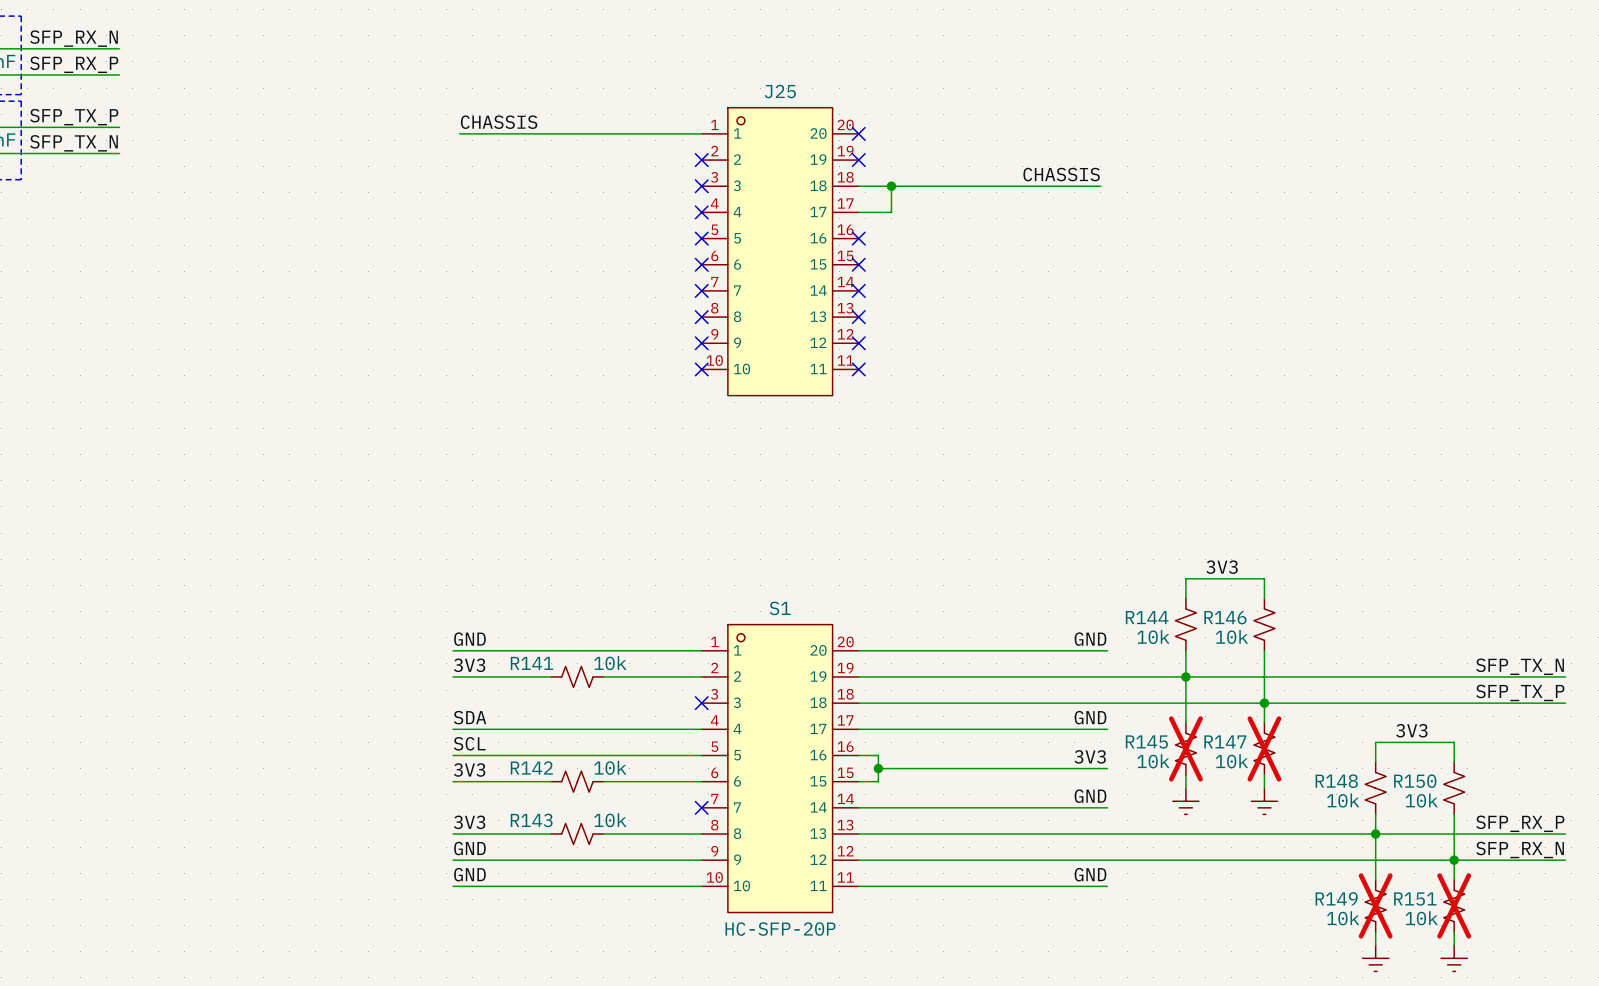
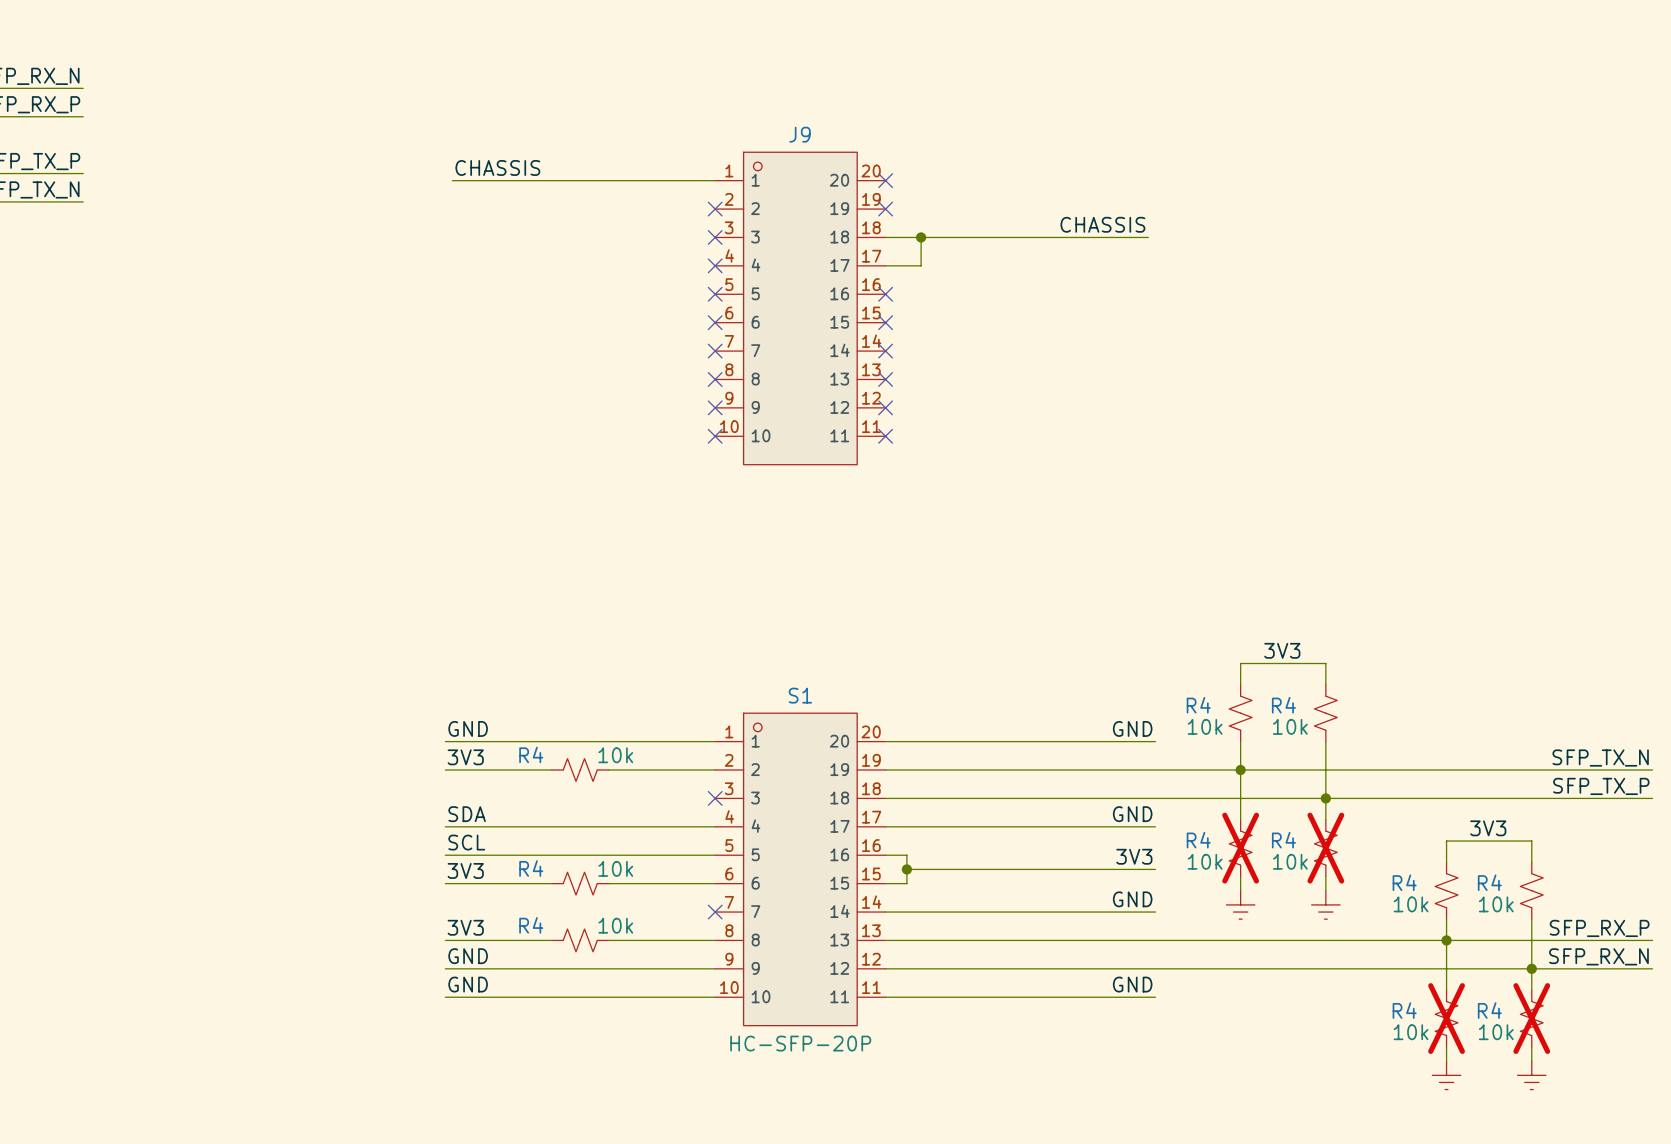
J25 name: J25 (780, 91) -> J9 (800, 134)
R144 name: R144 (1147, 617) -> R4 (1198, 705)
R146 name: R146 (1225, 617) -> R4 (1283, 705)
R141 name: R141 (531, 663) -> R4 (531, 754)
R147 name: R147 (1225, 741) -> R4 (1283, 840)
R145 name: R145 (1146, 742) -> R4 (1198, 840)
R142 name: R142 (531, 767) -> R4 (531, 868)
R148 name: R148 (1336, 781) -> R4 (1404, 882)
R150 name: R150 (1415, 781) -> R4 (1489, 882)
R143 name: R143 (531, 820) -> R4 (531, 925)
R149 name: R149 (1336, 898) -> R4 (1404, 1010)
R151 name: R151 (1415, 899) -> R4 (1489, 1010)

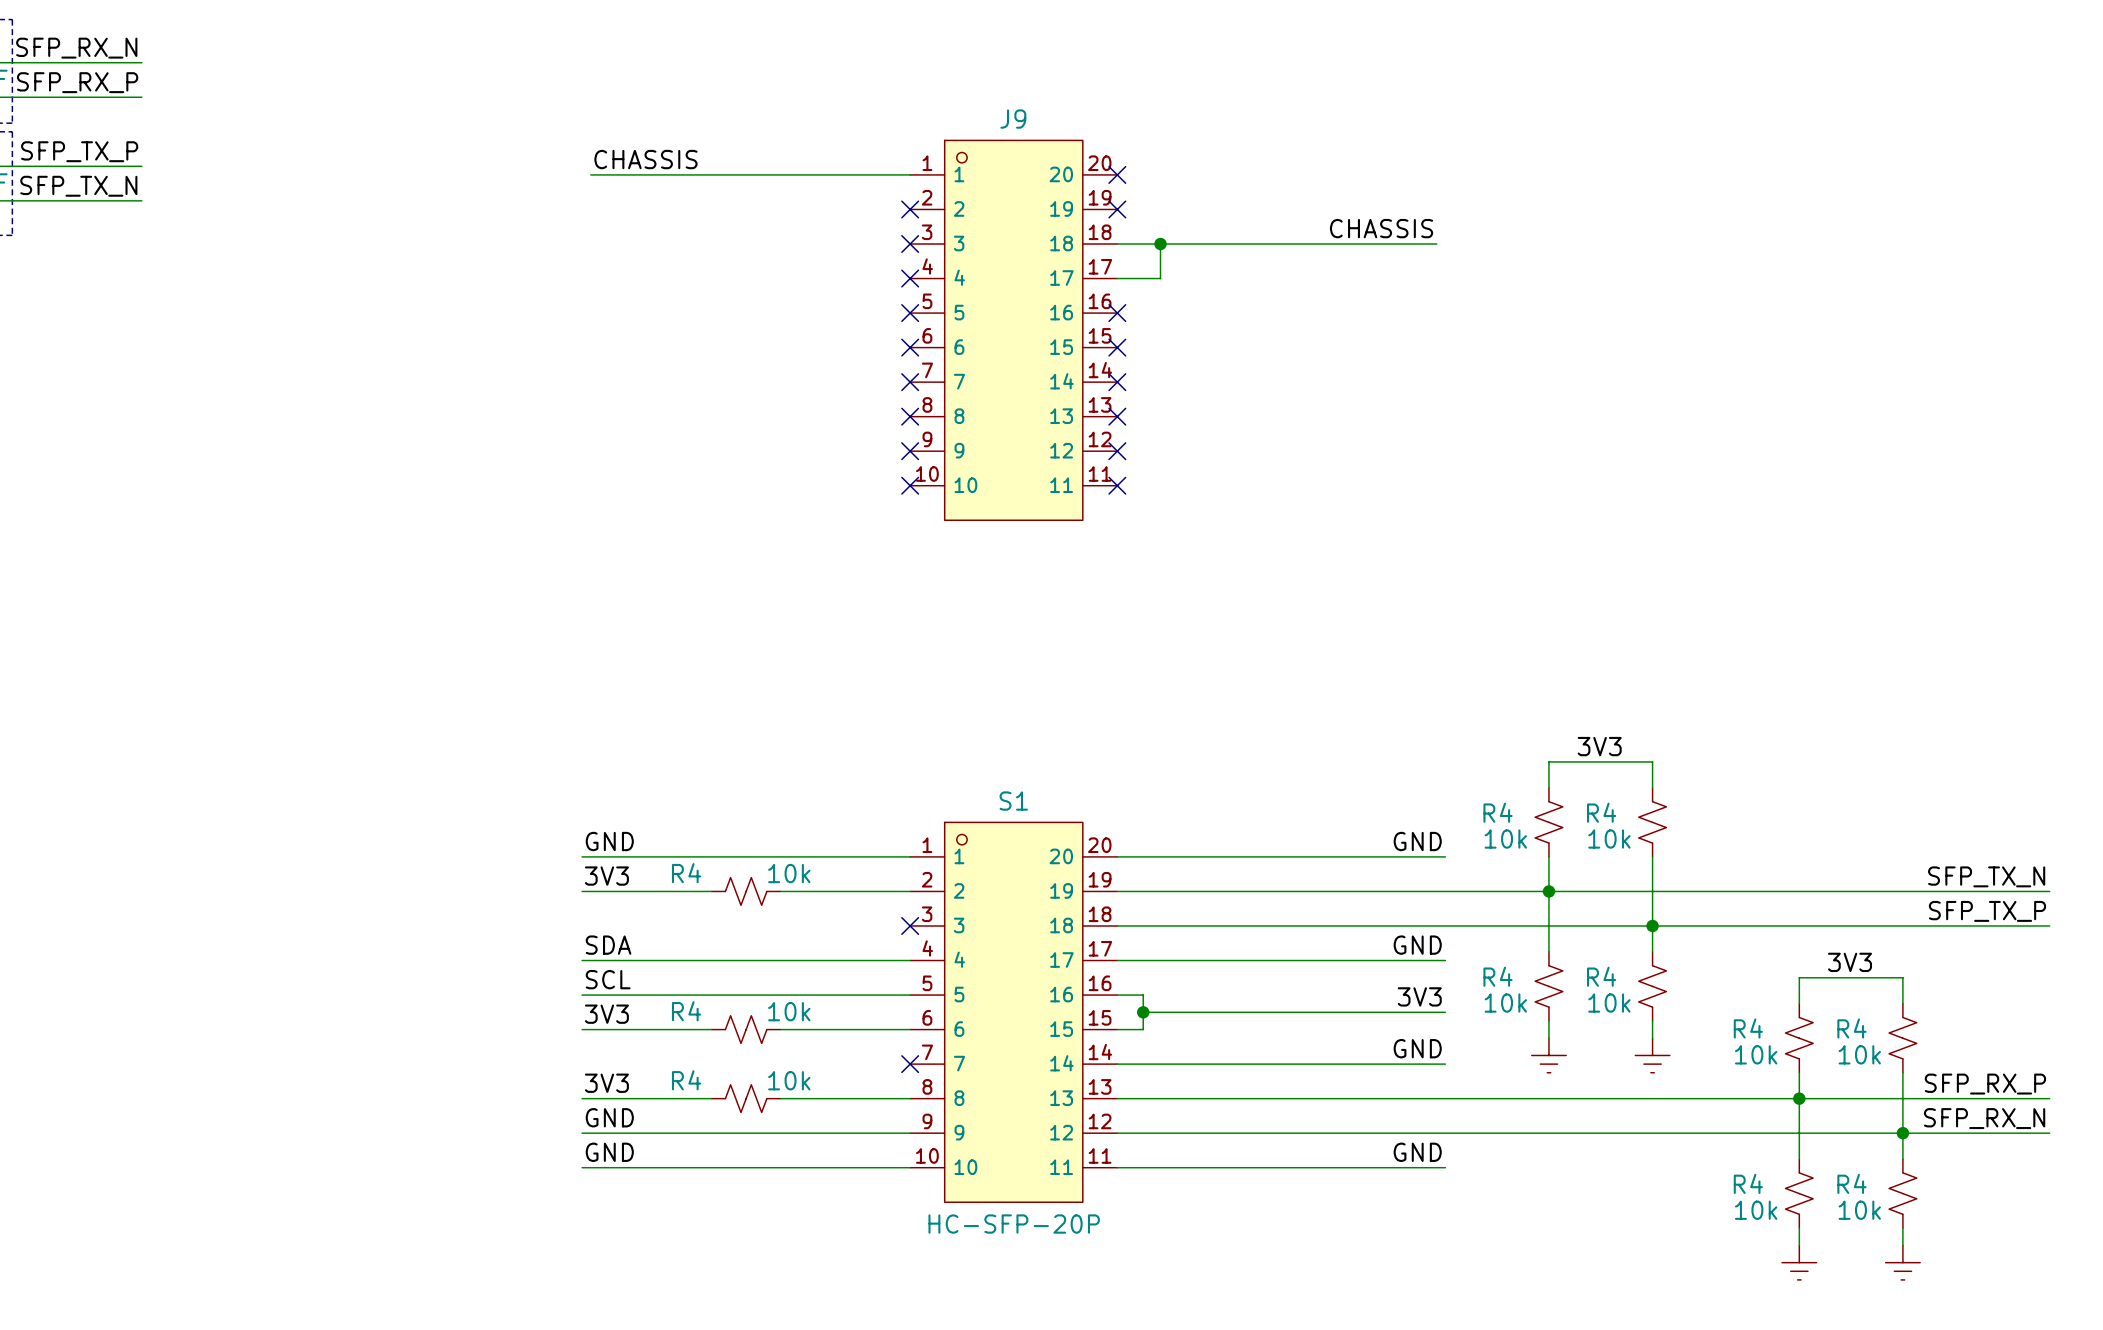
R4 do-not-place cross: (1240, 848) -> none
R4 do-not-place cross: (1325, 848) -> none
R4 do-not-place cross: (1446, 1018) -> none
R4 do-not-place cross: (1531, 1018) -> none

